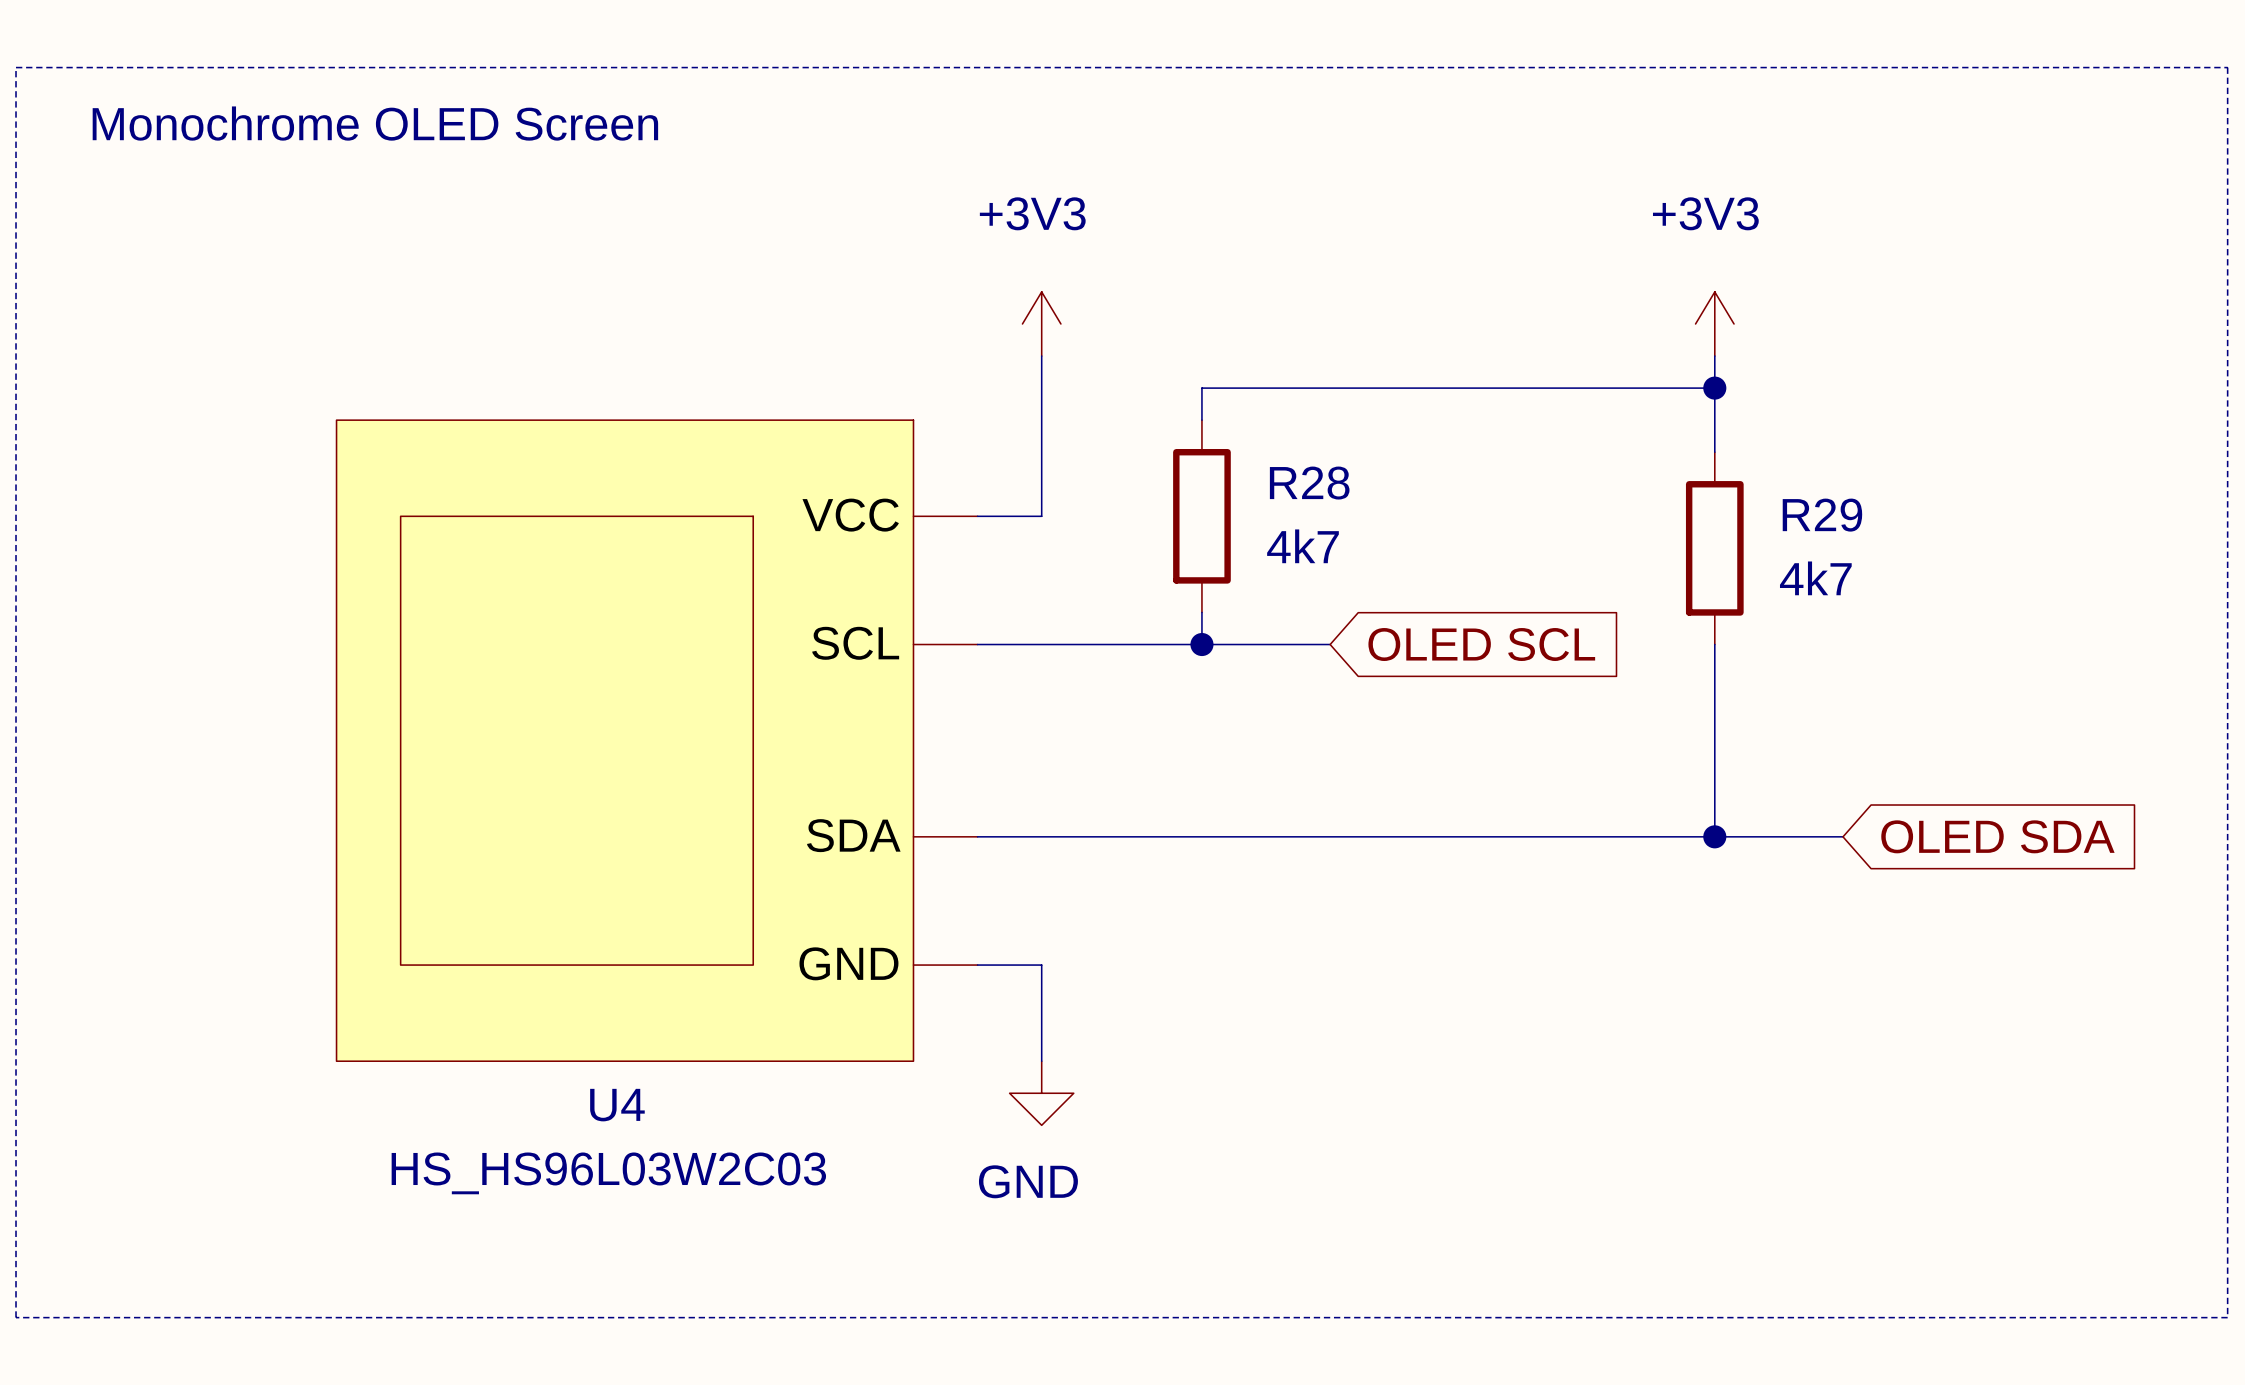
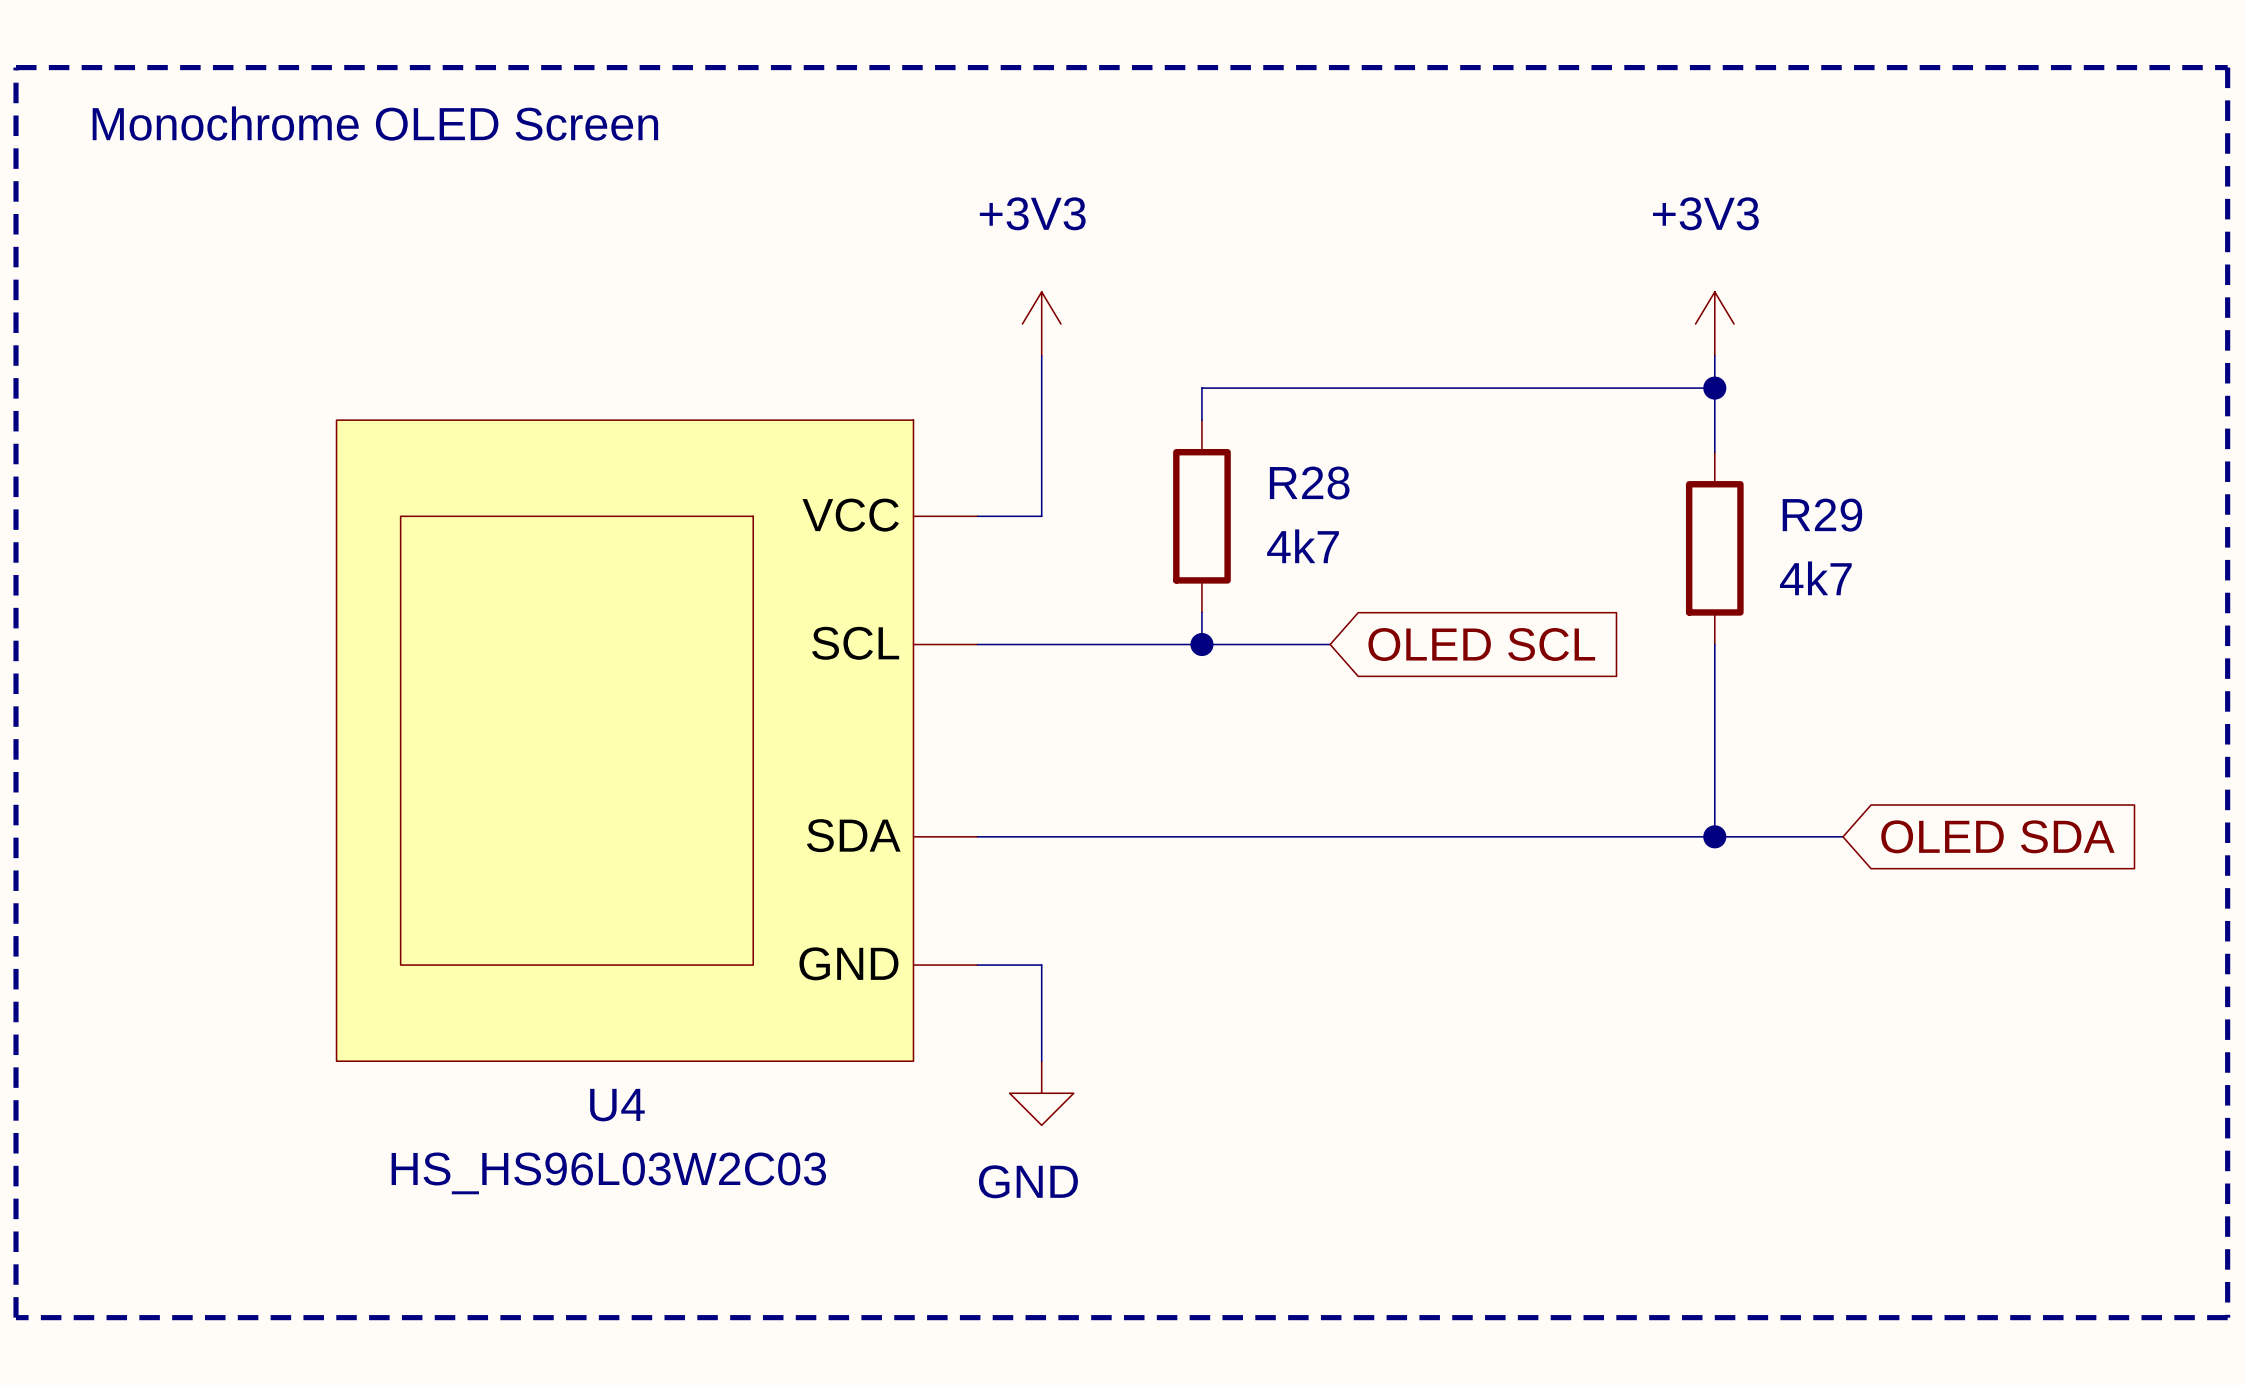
line width: thin (16, 67) (2227, 67) (2227, 1317) (16, 1317) (16, 67) -> thick (16, 67) (2227, 67) (2227, 1317) (16, 1317) (16, 67)

